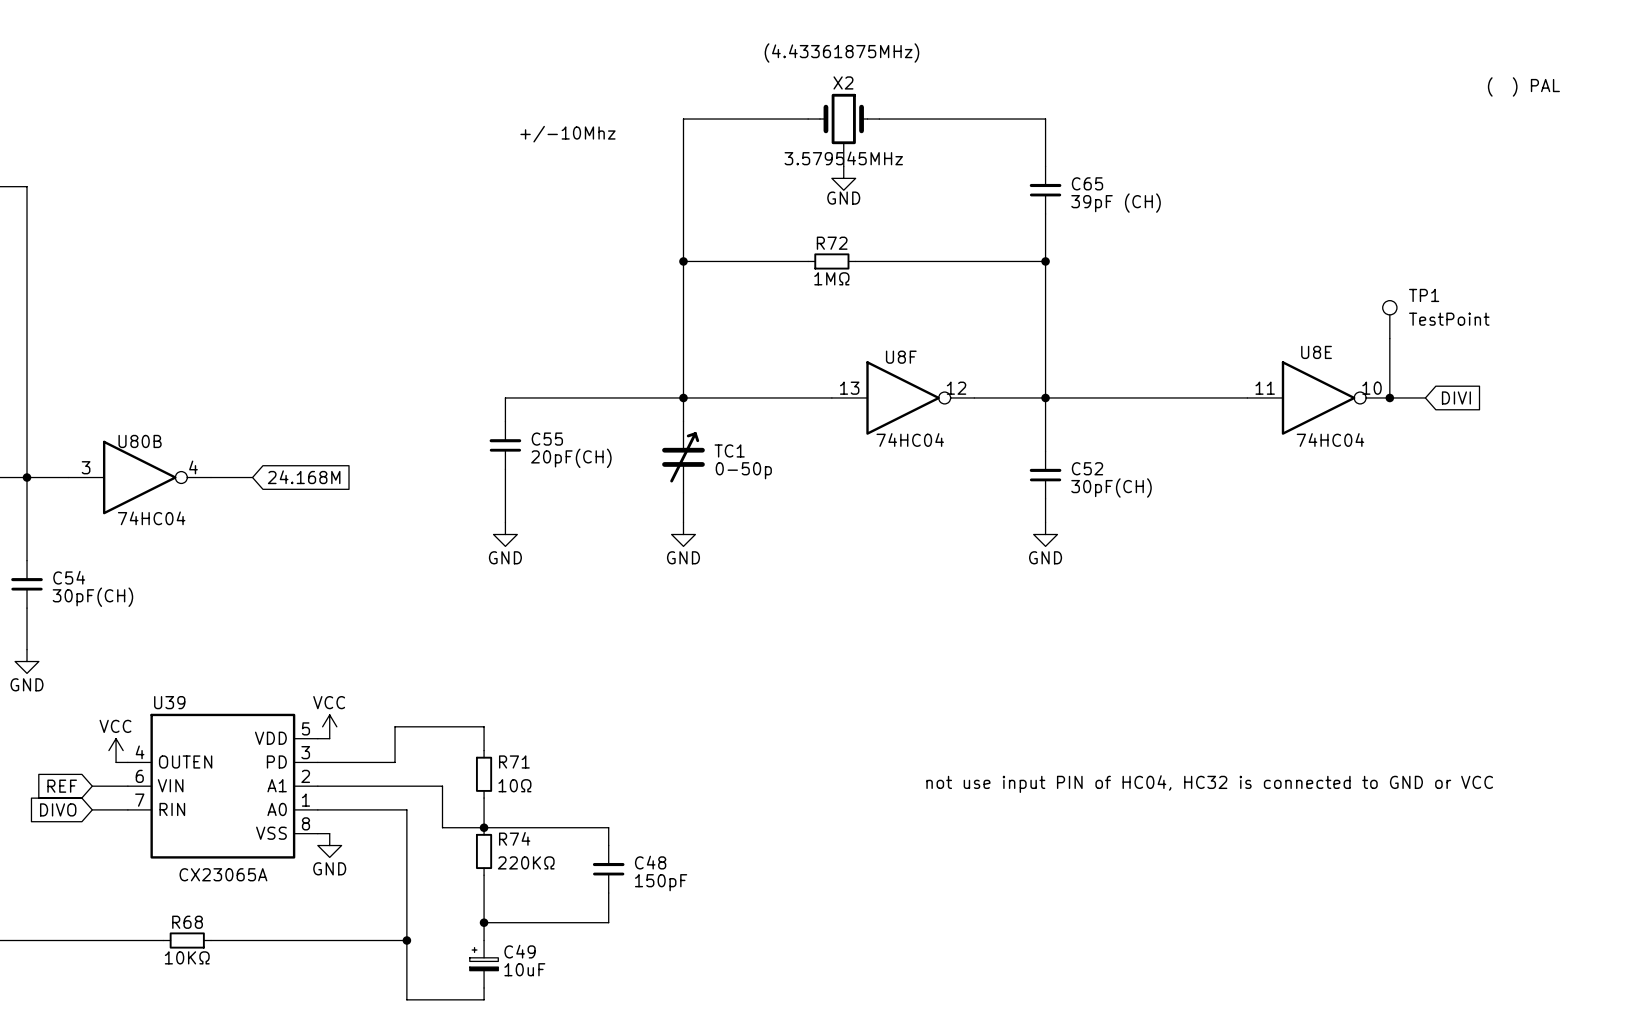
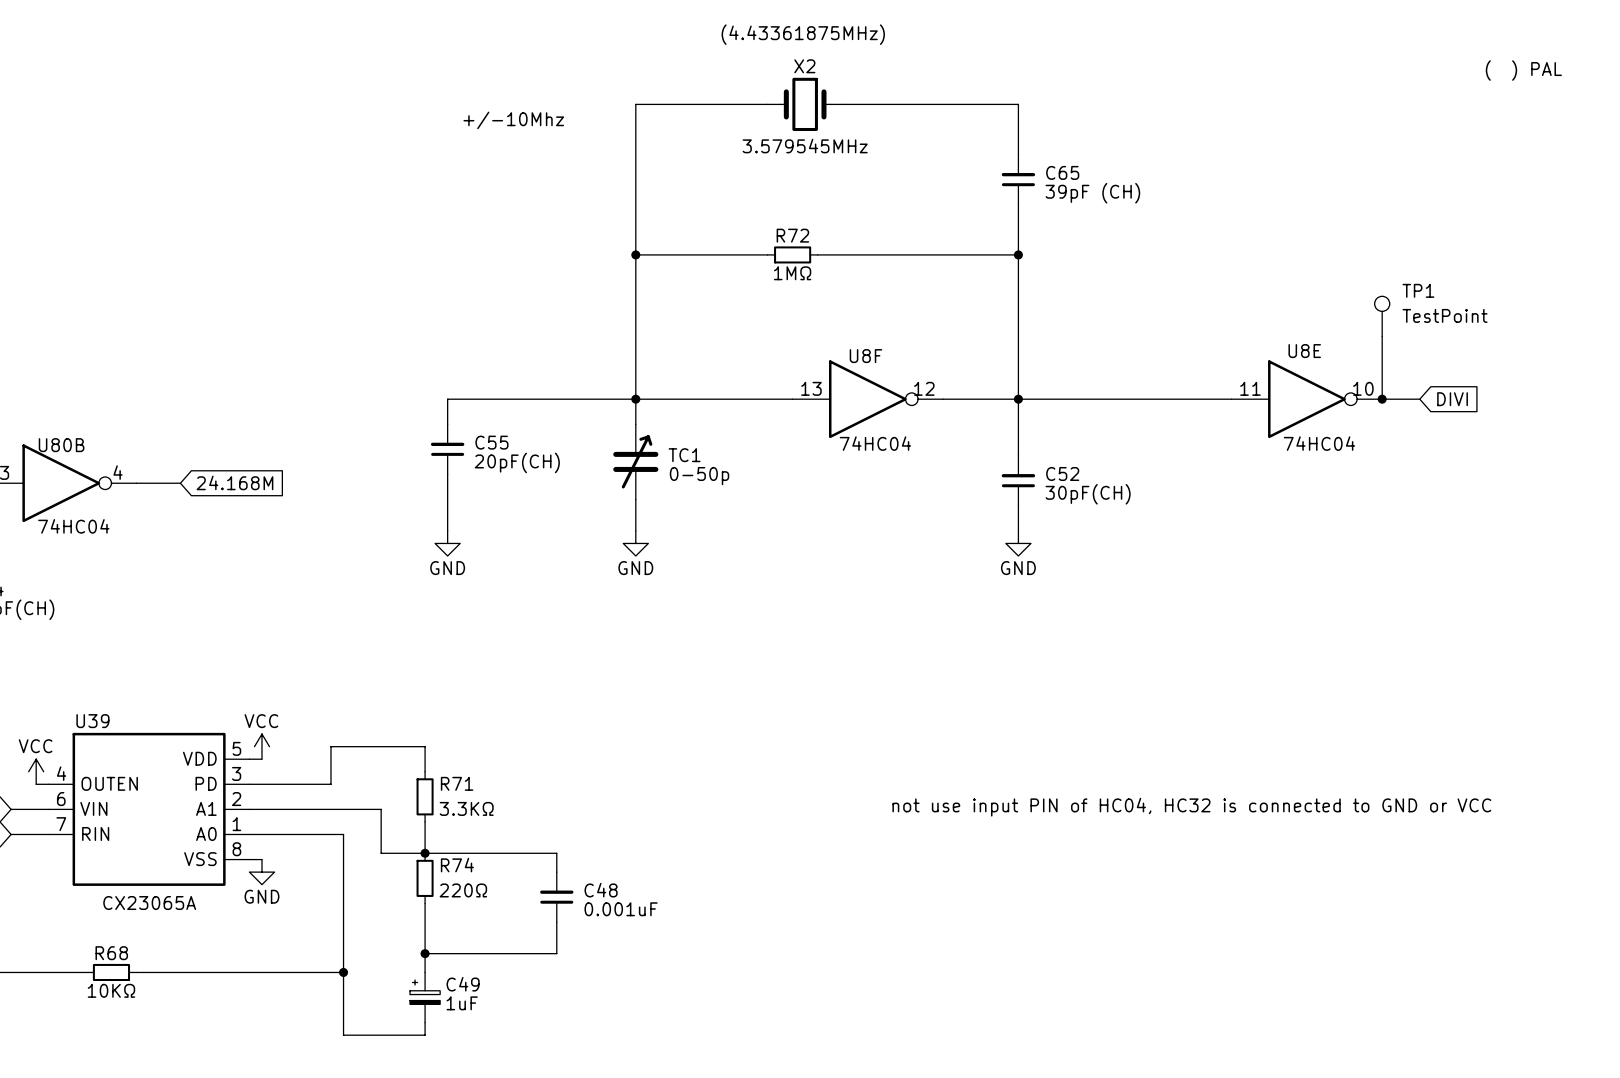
X2 symbol: [808, 93, 880, 167] -> [767, 77, 843, 132]
power symbol: GND (843, 178) -> none
R71 value: 10Ω (514, 785) -> 3.3KΩ (466, 808)
R74 value: 220KΩ (526, 862) -> 220Ω (463, 890)
C48 value: 150pF (661, 882) -> 0.001uF (621, 909)
C49 value: 10uF (524, 969) -> 1uF (462, 1003)

